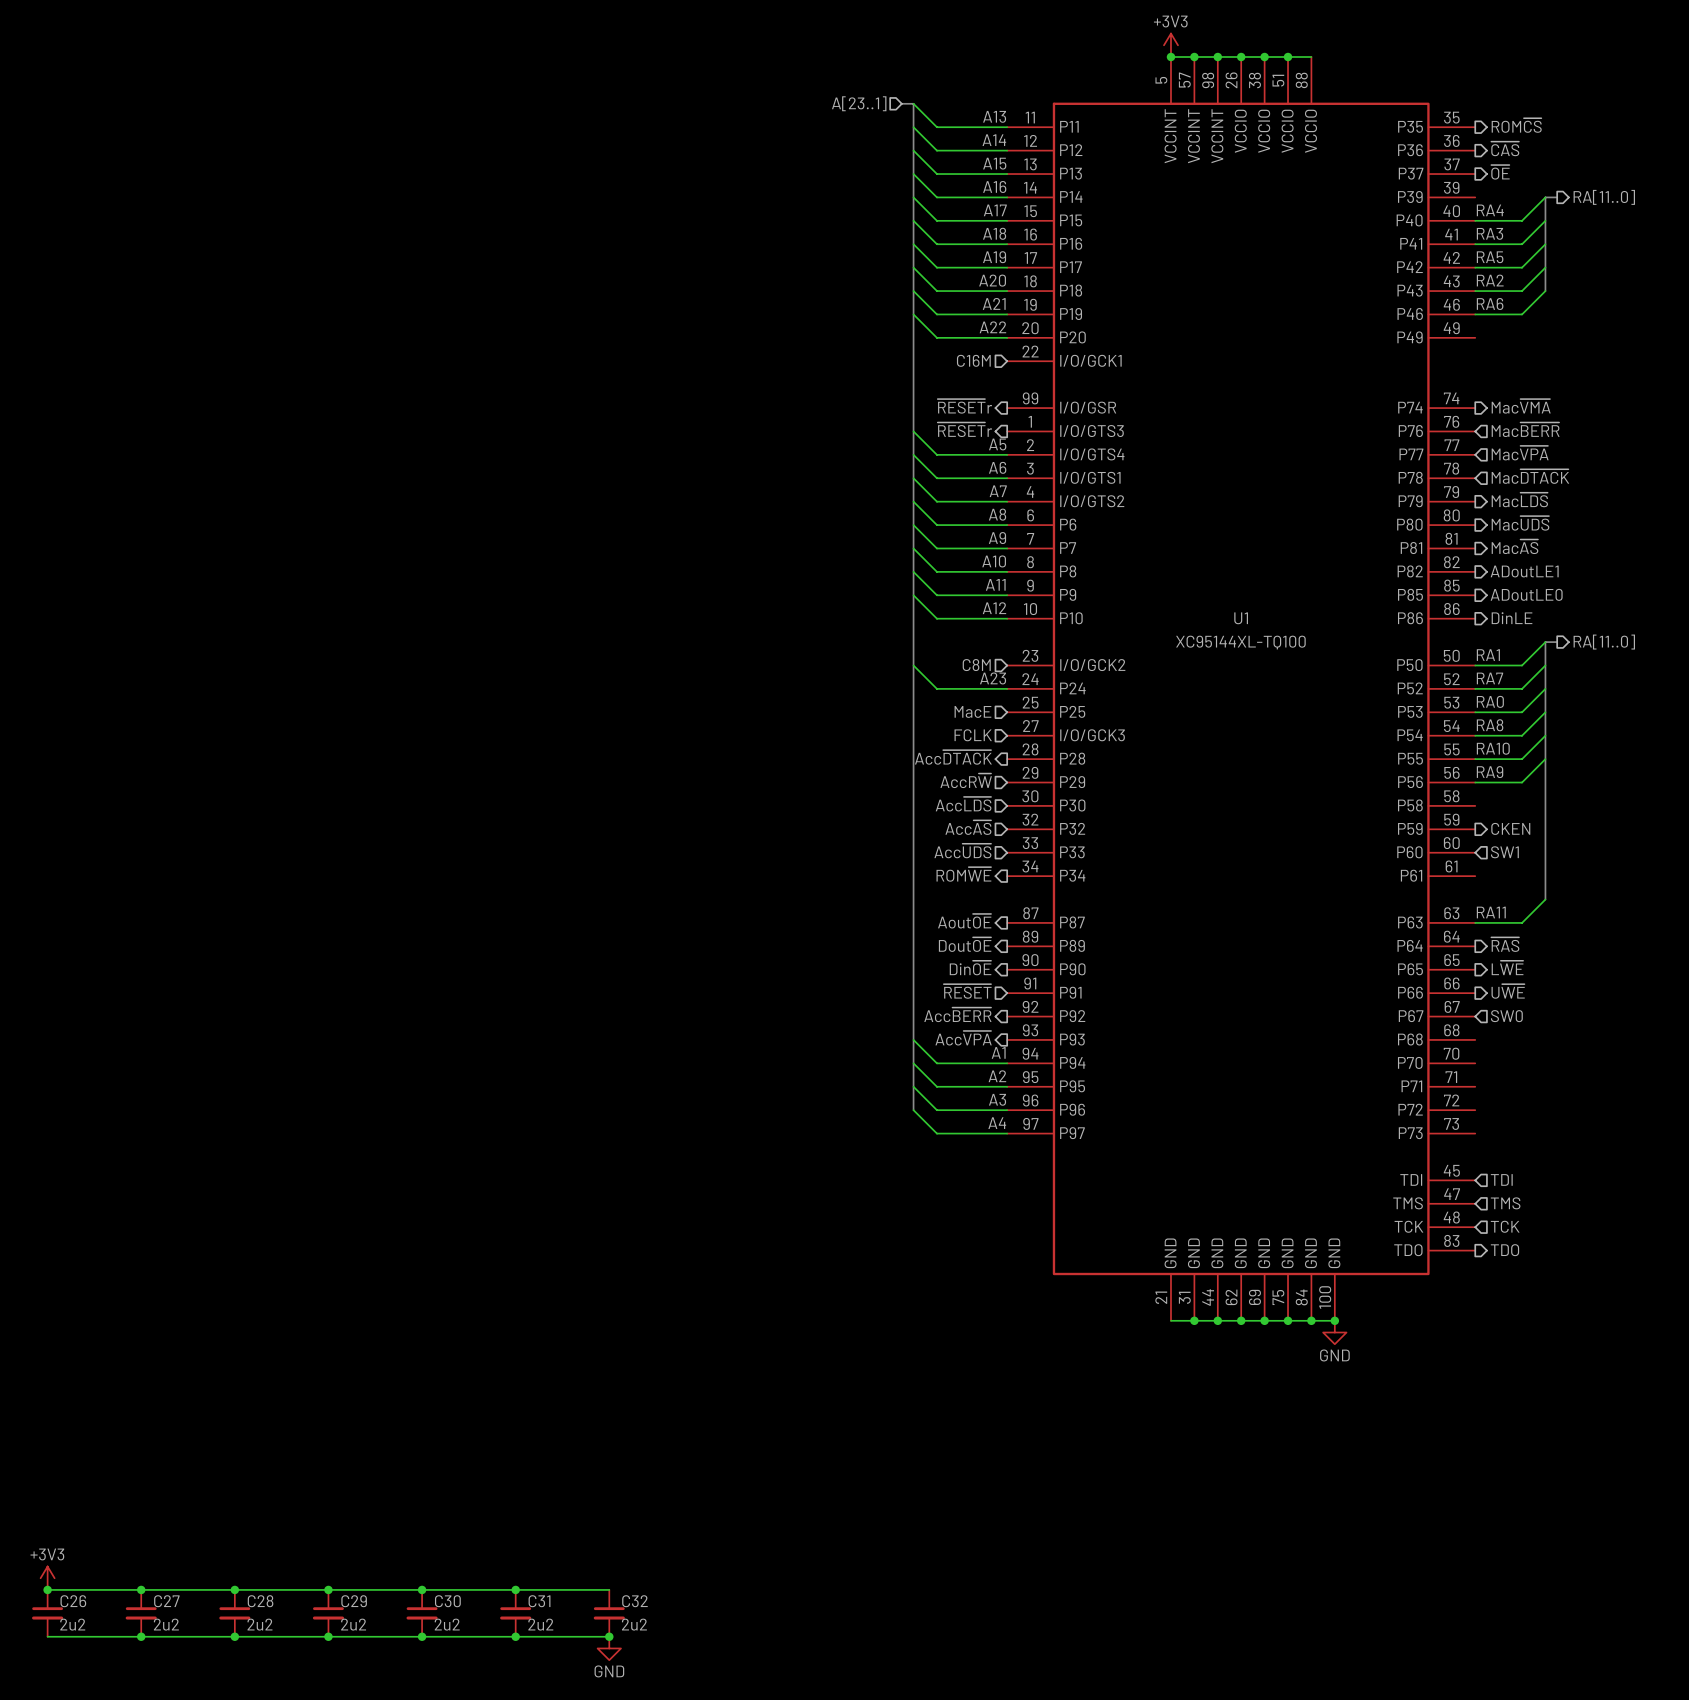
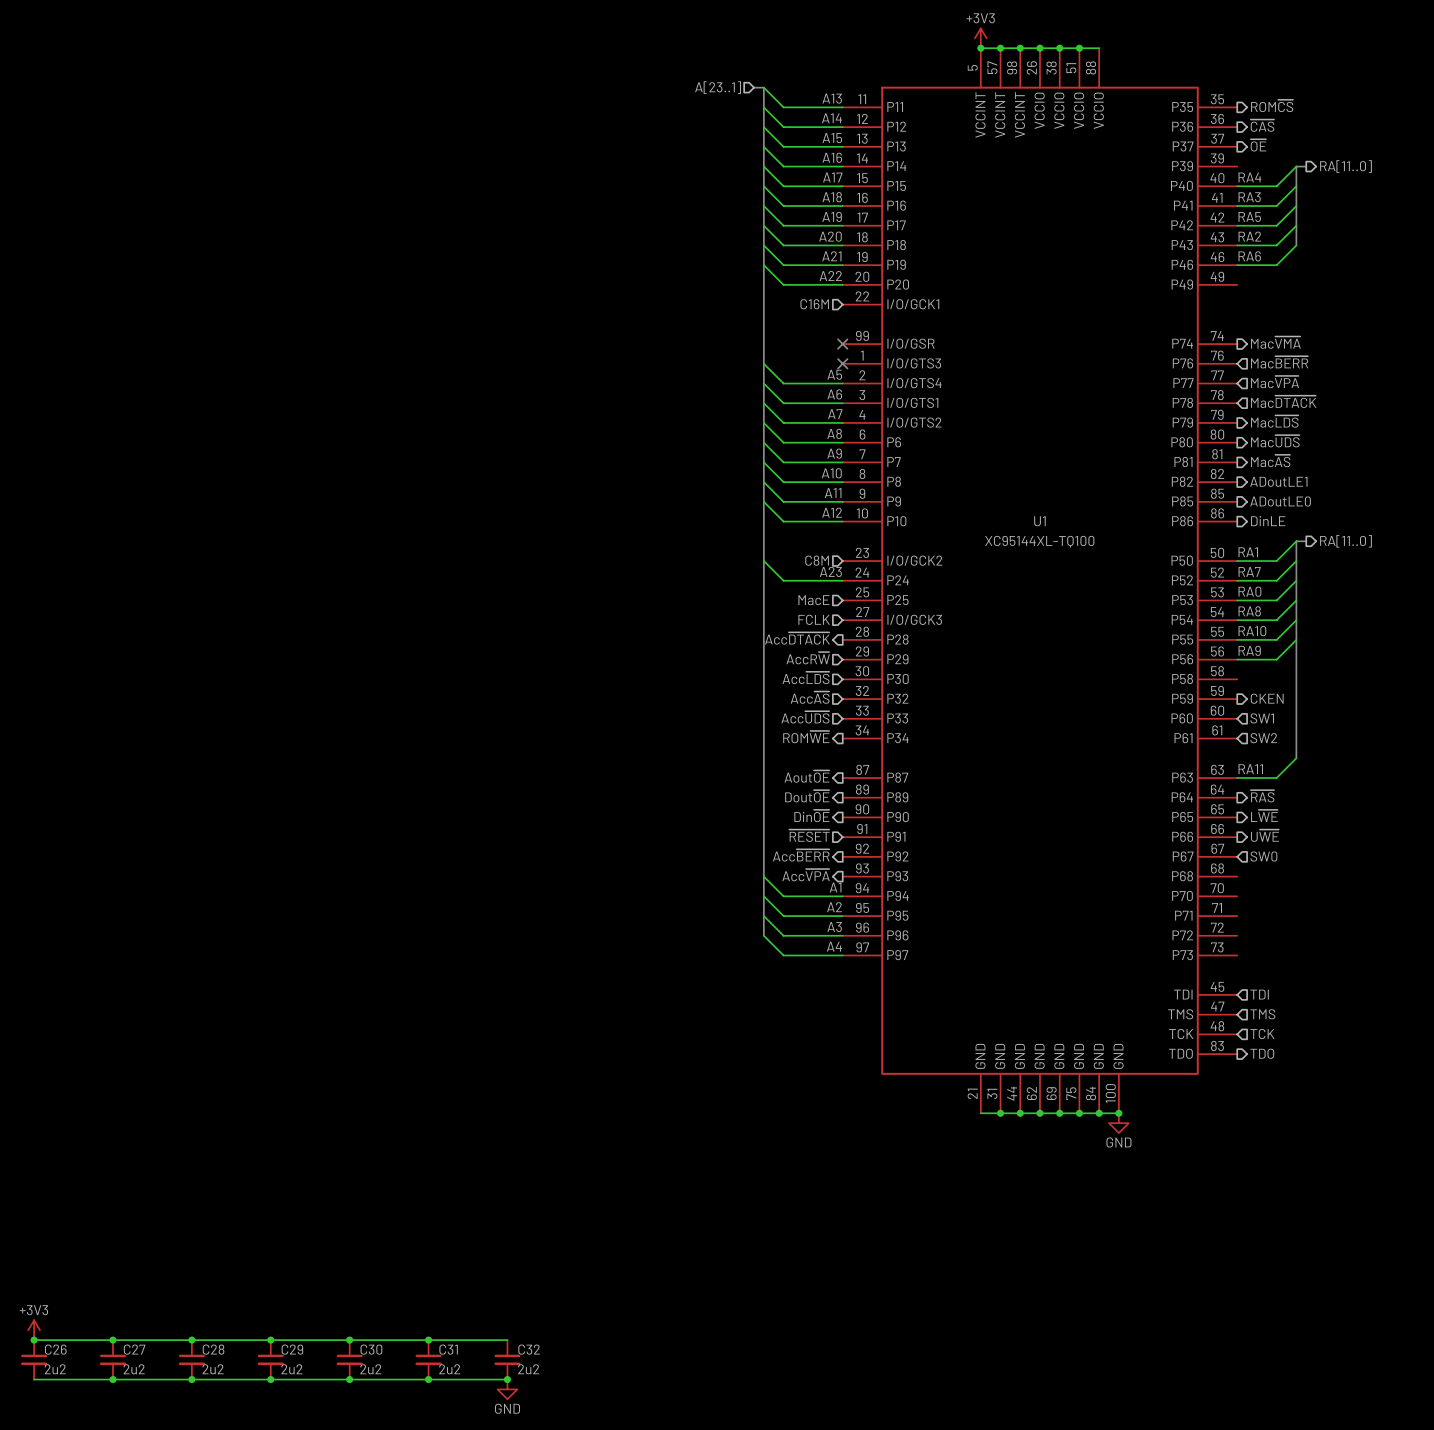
hierarchical label: ~{RESET}r (964, 406) -> none
no-connect mark: none -> (842, 344)
hierarchical label: ~{RESET}r (964, 429) -> none
no-connect mark: none -> (842, 363)
hierarchical label: none -> SW2 (1263, 738)

